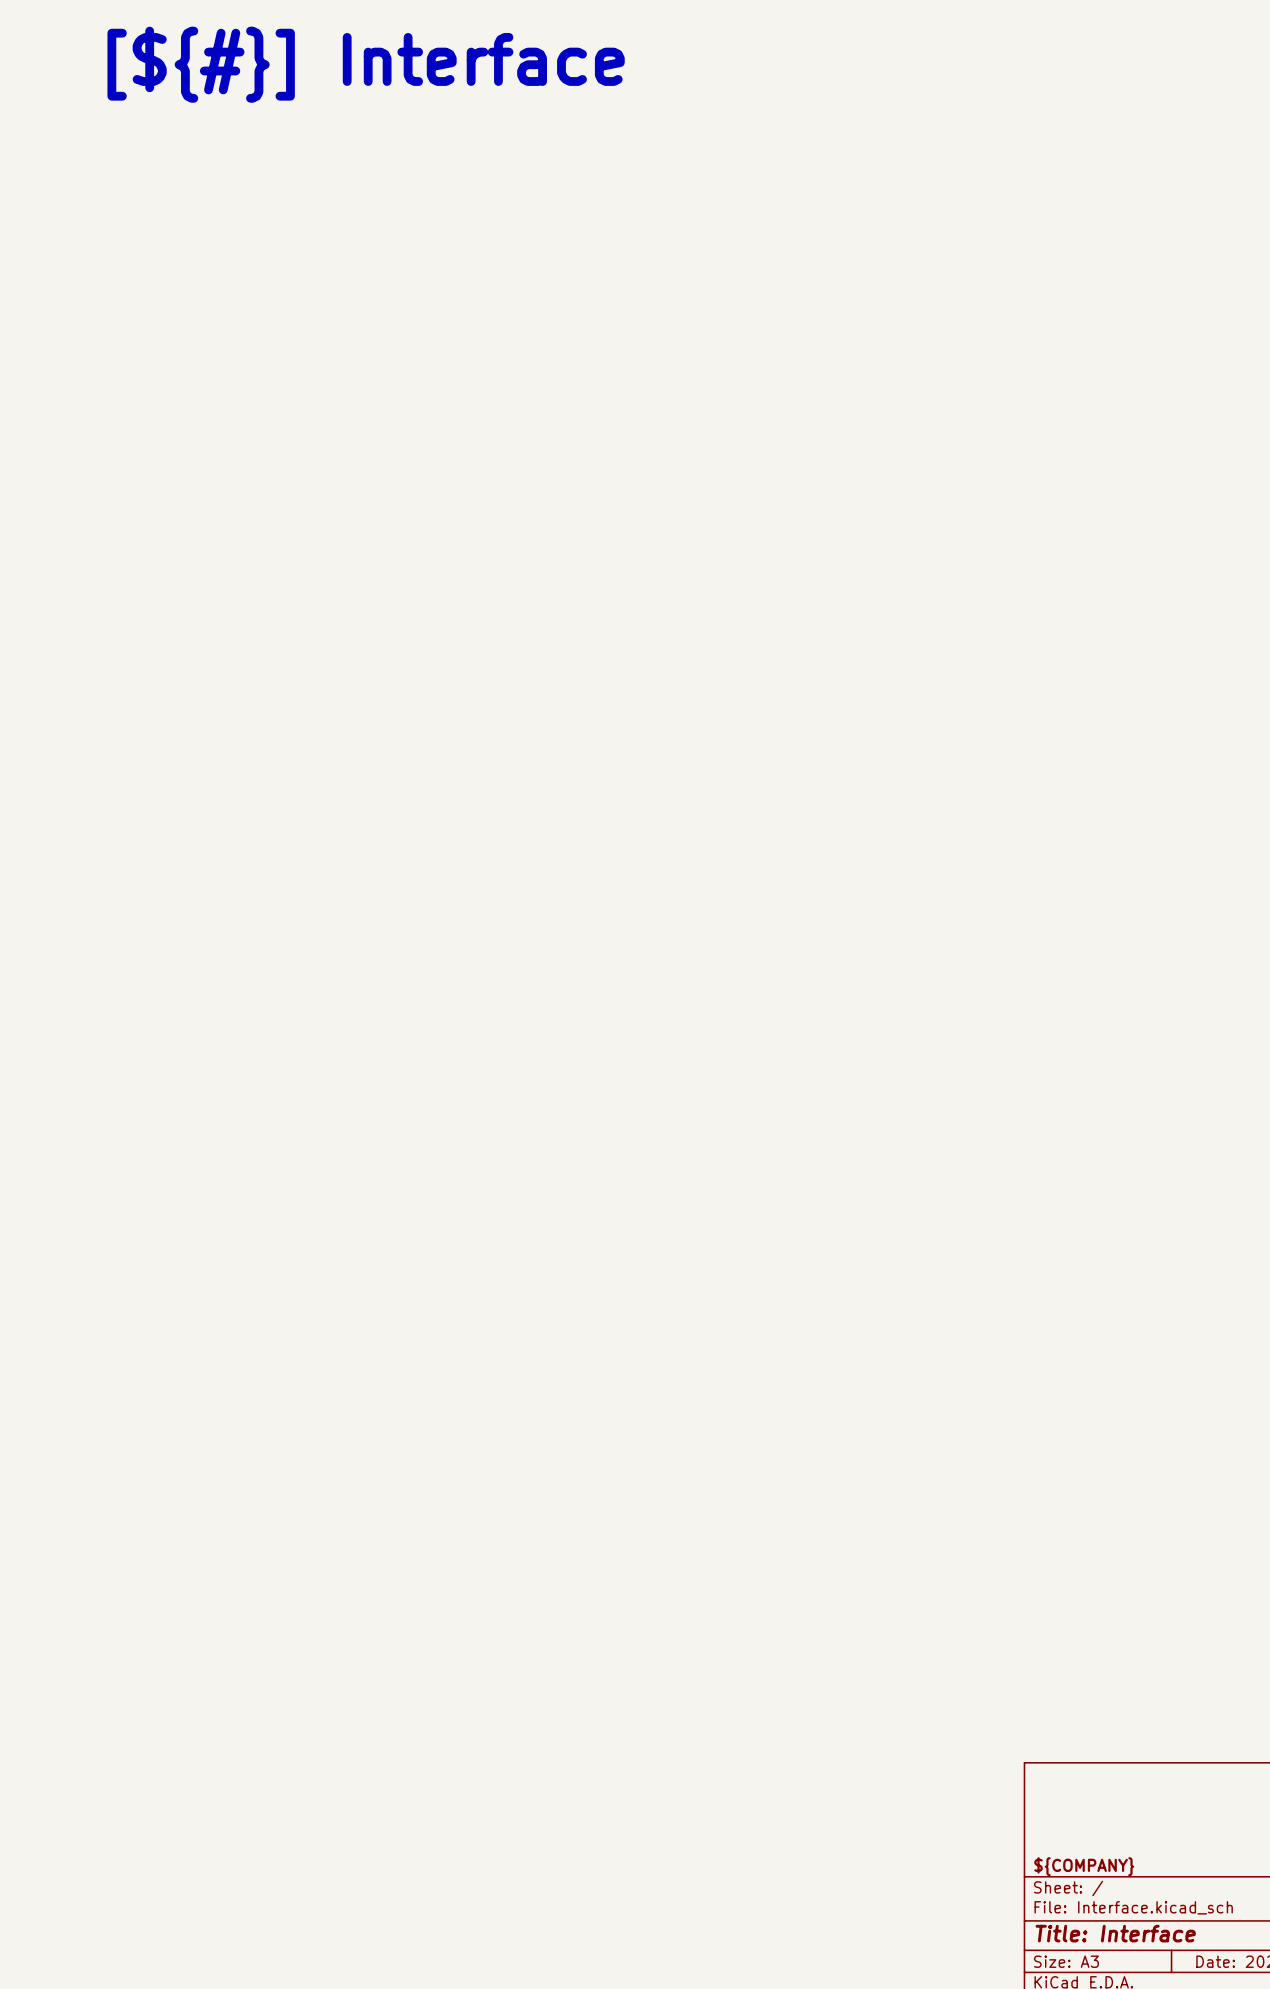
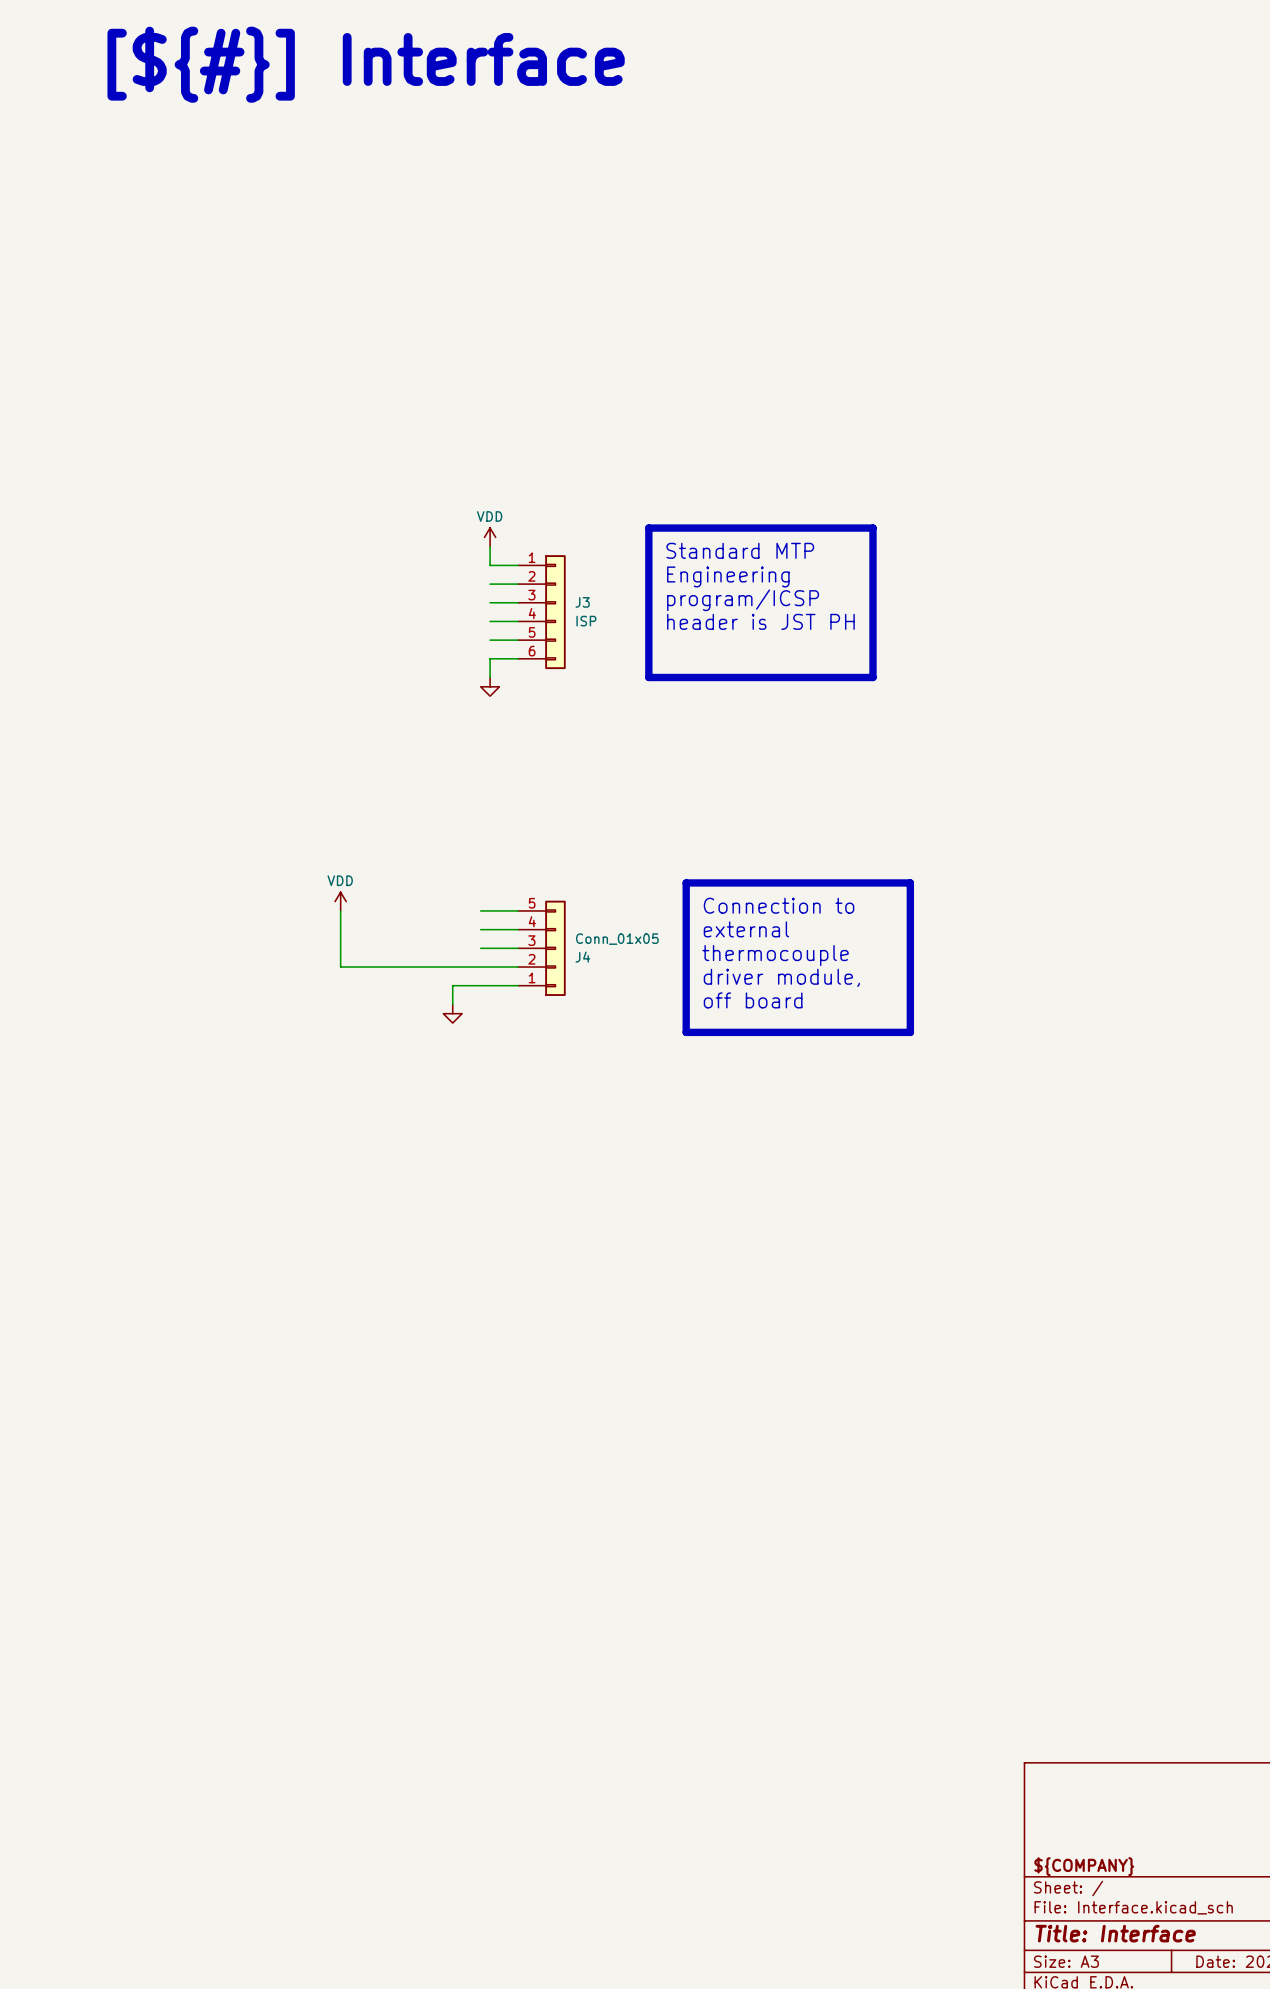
line: none -> (648, 528) (872, 528) (872, 677) (648, 677) (648, 528)
power symbol: none -> VDD (490, 537)
wire: none -> (490, 546) (490, 565) (518, 565)
text: none -> Standard MTP (740, 550)
text: none -> Engineering (728, 576)
wire: none -> (490, 584) (518, 584)
text: none -> program/ICSP (743, 600)
wire: none -> (490, 602) (518, 602)
J3: none -> ISP (541, 612)
wire: none -> (490, 621) (518, 621)
text: none -> header is JST PH (760, 621)
wire: none -> (490, 640) (518, 640)
wire: none -> (518, 658) (490, 658) (490, 677)
power symbol: none -> (490, 686)
line: none -> (686, 882) (910, 882) (910, 1032) (686, 1032) (686, 882)
power symbol: none -> VDD (340, 901)
text: none -> Connection to (779, 905)
wire: none -> (340, 910) (340, 967) (518, 967)
wire: none -> (480, 910) (518, 910)
wire: none -> (480, 929) (518, 929)
text: none -> external (746, 929)
wire: none -> (480, 948) (518, 948)
J4: none -> Conn_01x05 (541, 948)
text: none -> thermocouple (775, 955)
text: none -> driver module, (781, 977)
wire: none -> (518, 985) (452, 985) (452, 1004)
text: none -> off board (753, 1000)
power symbol: none -> (452, 1013)

